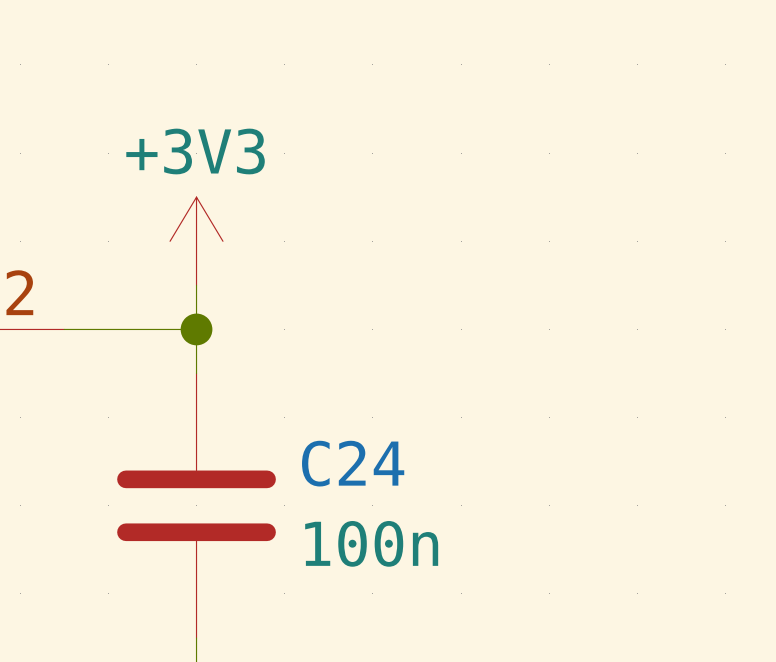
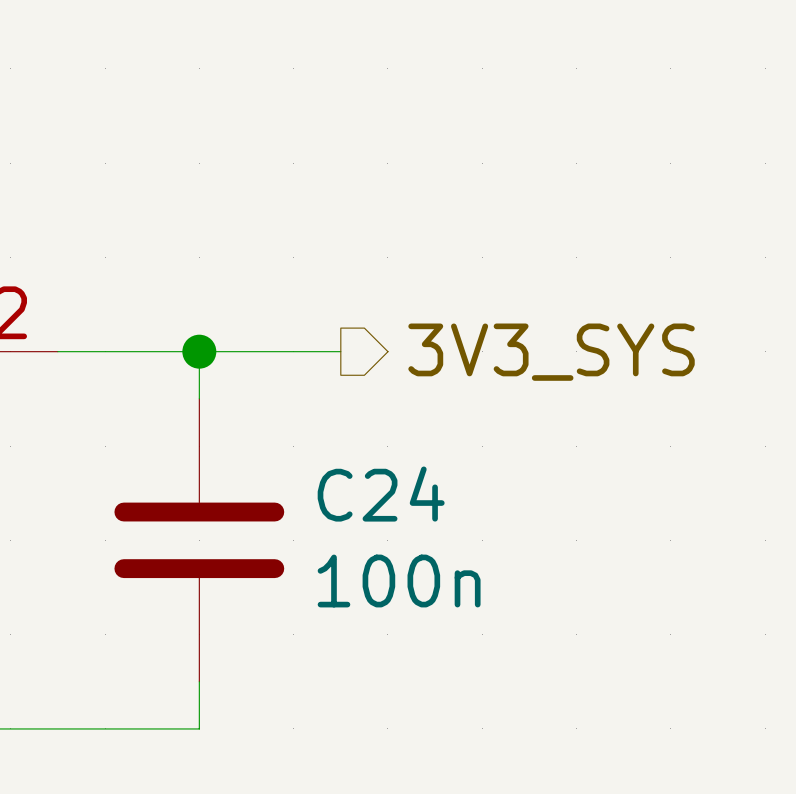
power symbol: +3V3 (196, 241) -> none
wire: (196, 285) (196, 329) -> (340, 351) (199, 351)
hierarchical label: none -> 3V3_SYS (551, 352)

